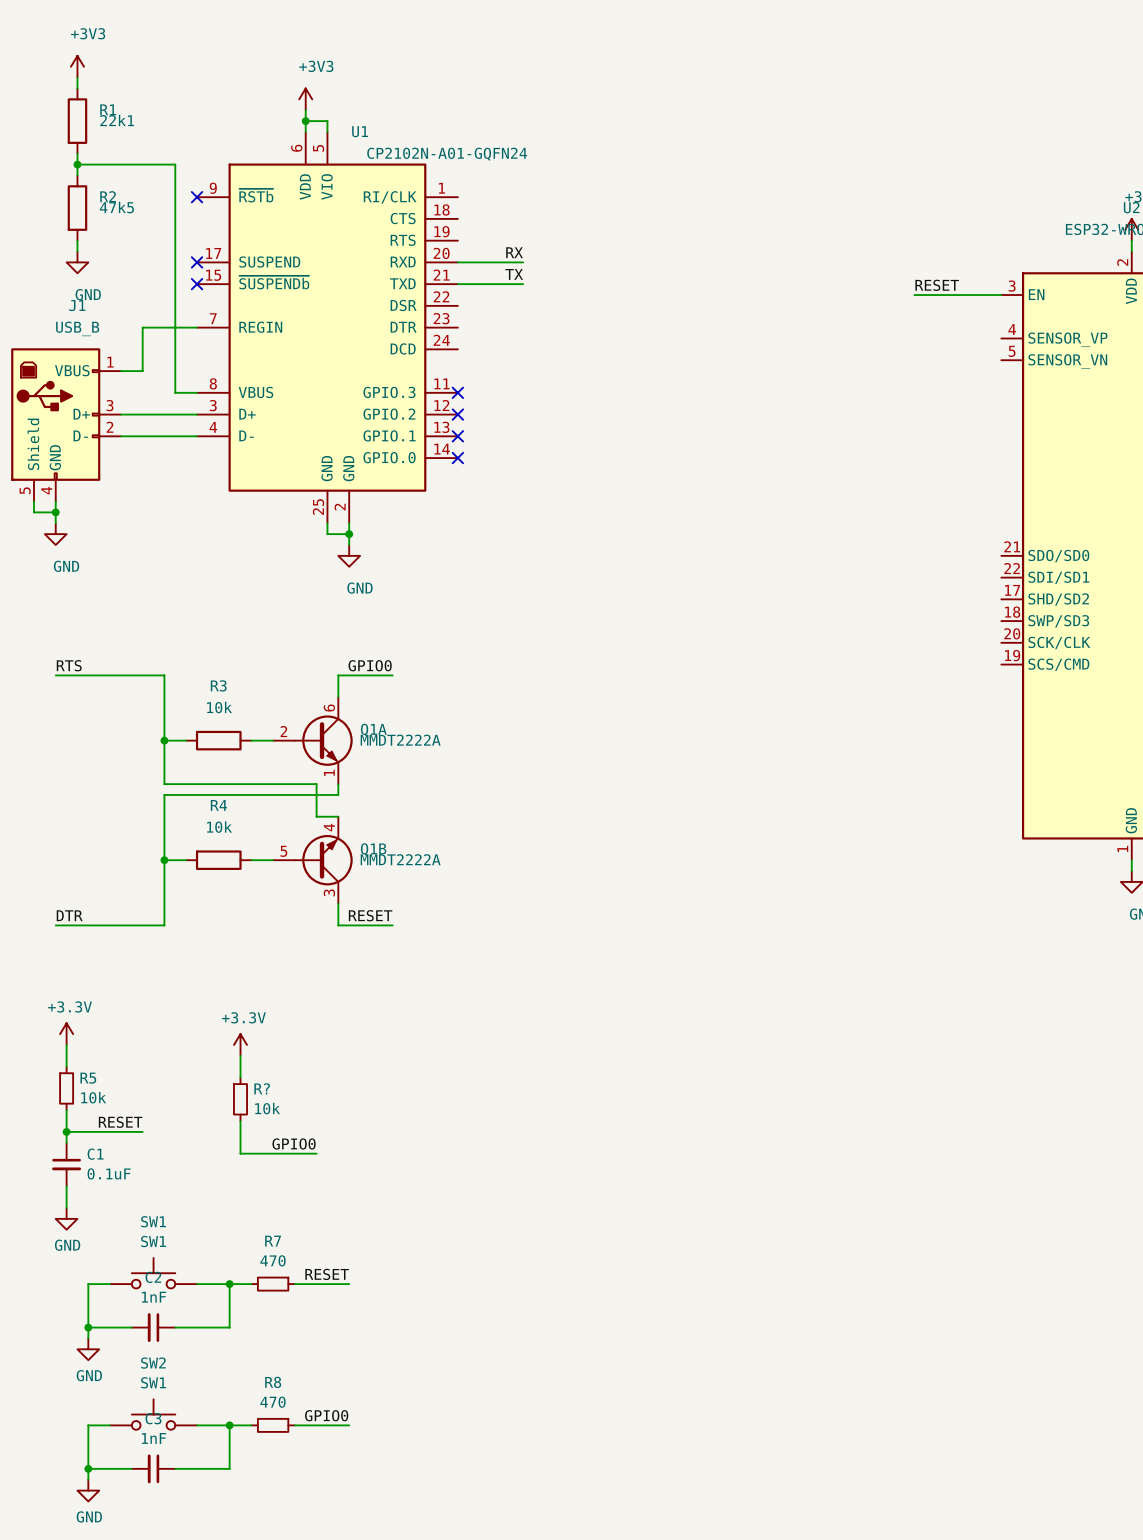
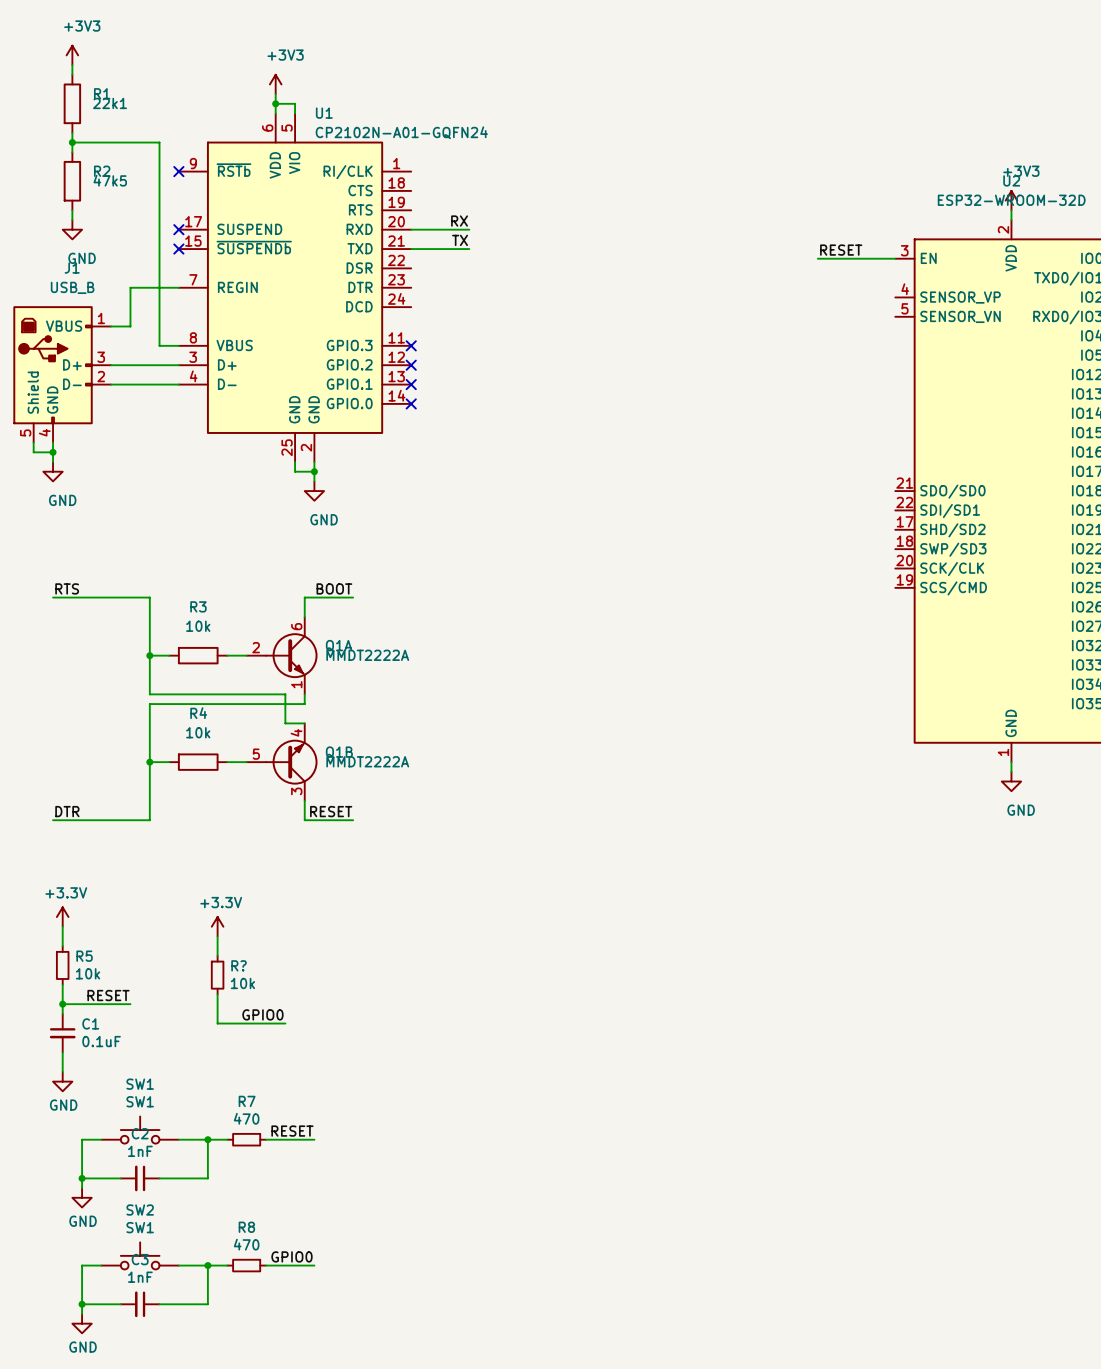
label: GPIO0 (370, 665) -> BOOT (334, 588)

